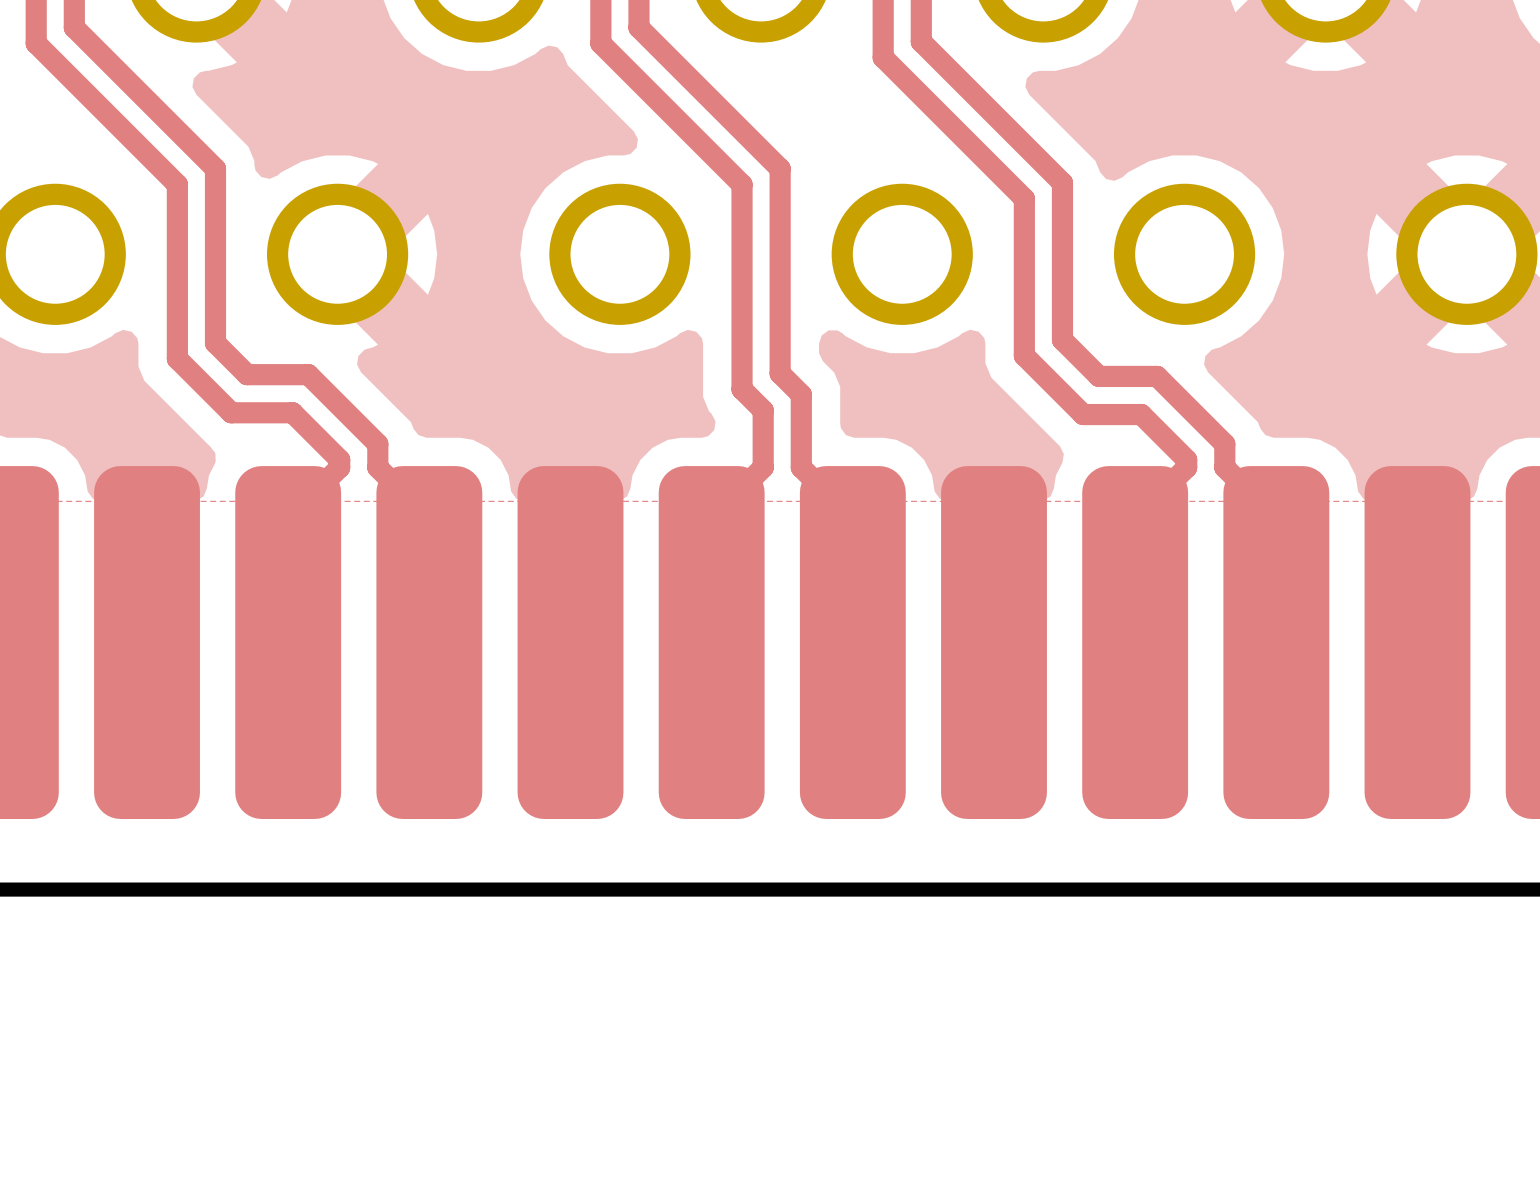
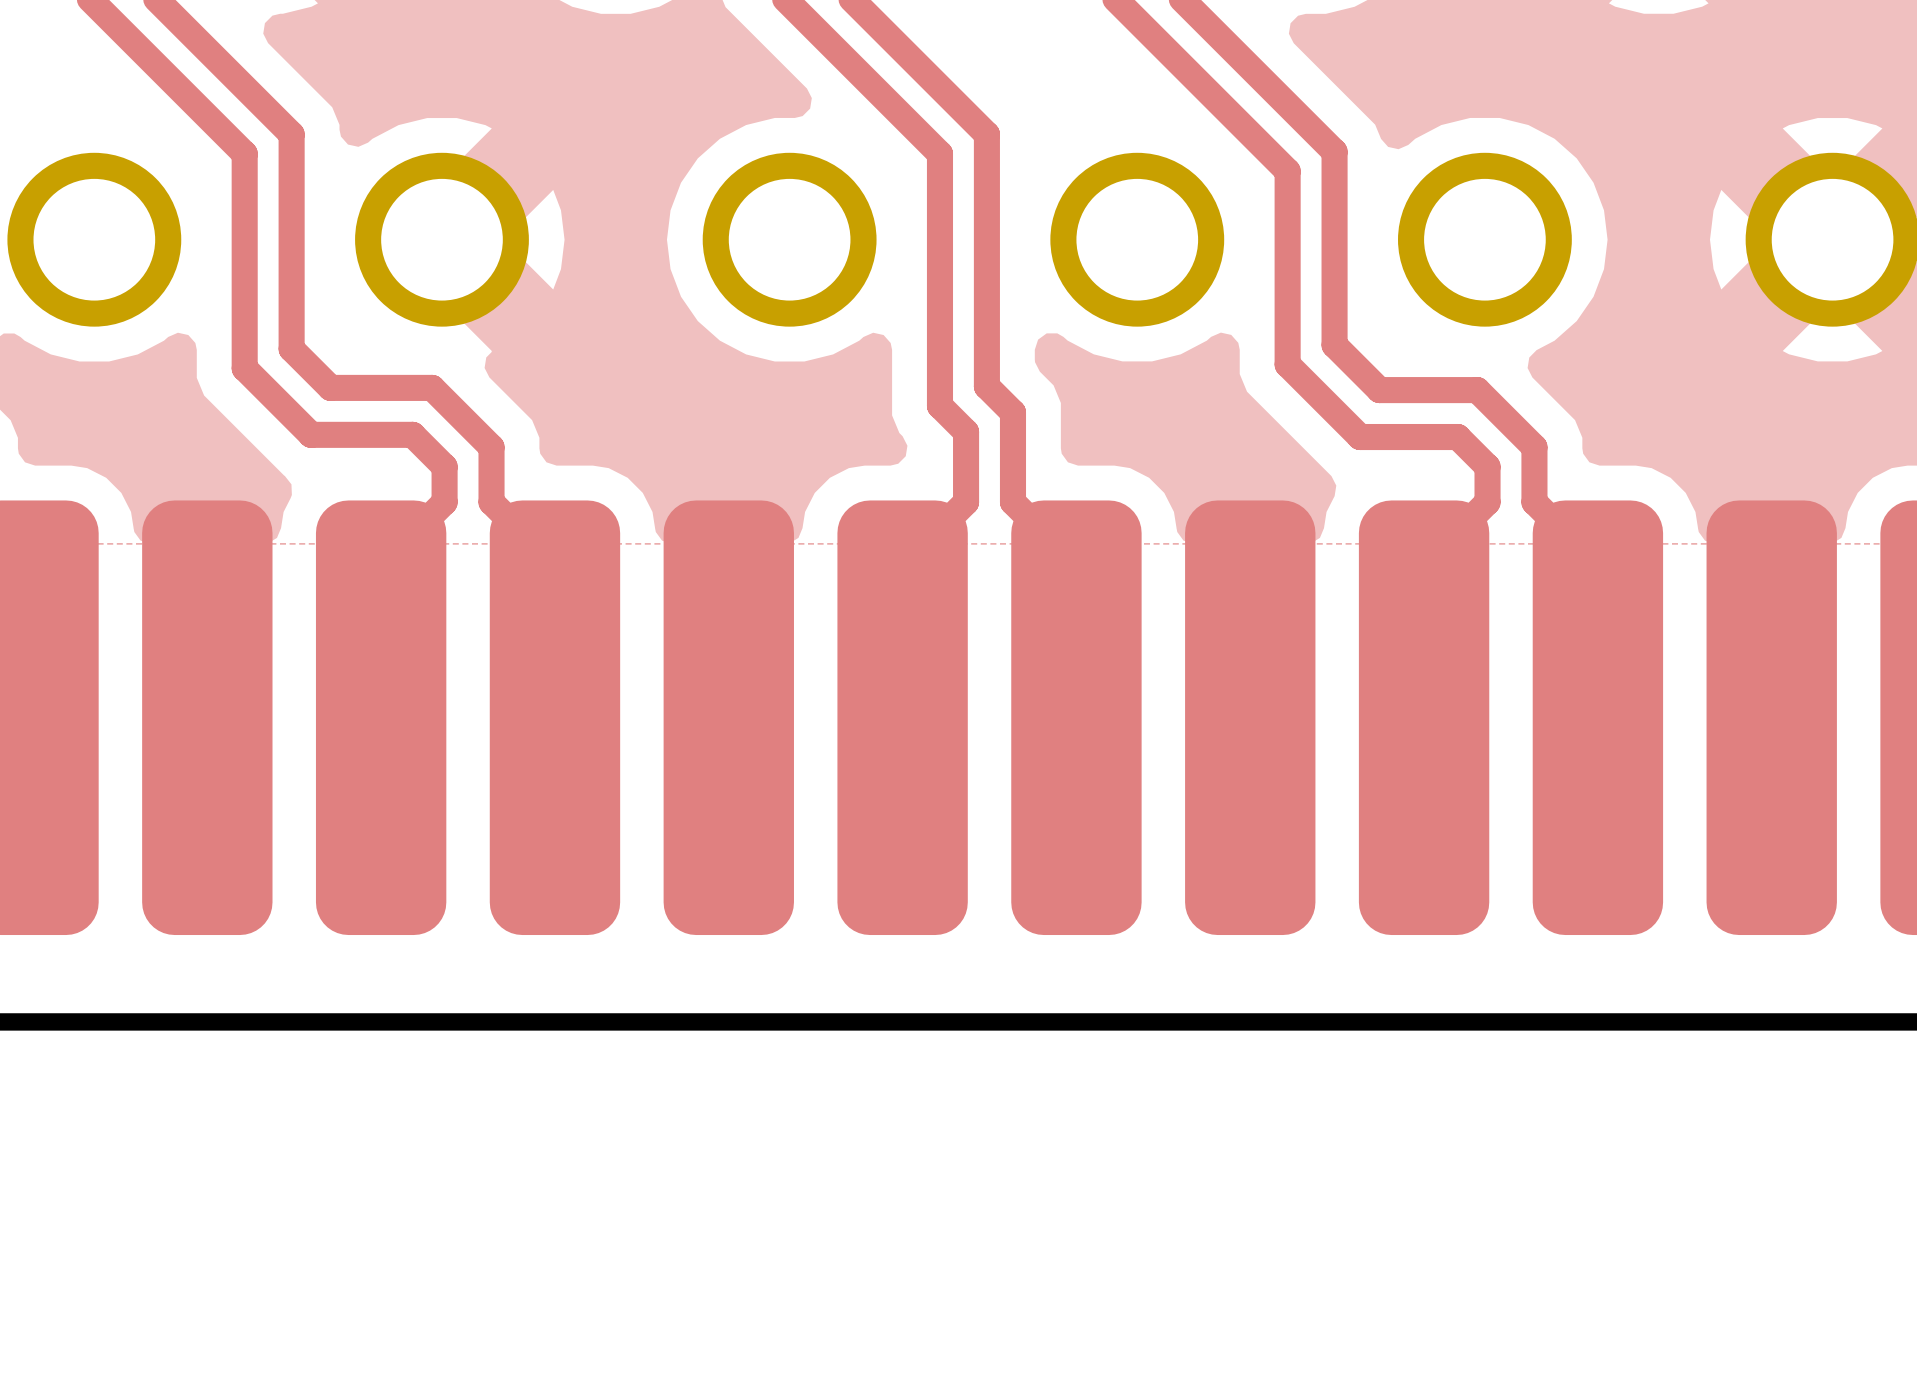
track: (308, 374) (377, 444) -> (406, 387) (432, 387) (491, 447) (491, 473)
track: (1157, 376) (1224, 444) -> (1451, 390) (1477, 390) (1534, 447) (1534, 473)
track: (292, 412) (339, 459) -> (386, 434) (412, 434) (444, 466) (444, 492)
track: (1141, 414) (1186, 459) -> (1431, 437) (1457, 437) (1487, 466) (1487, 492)

